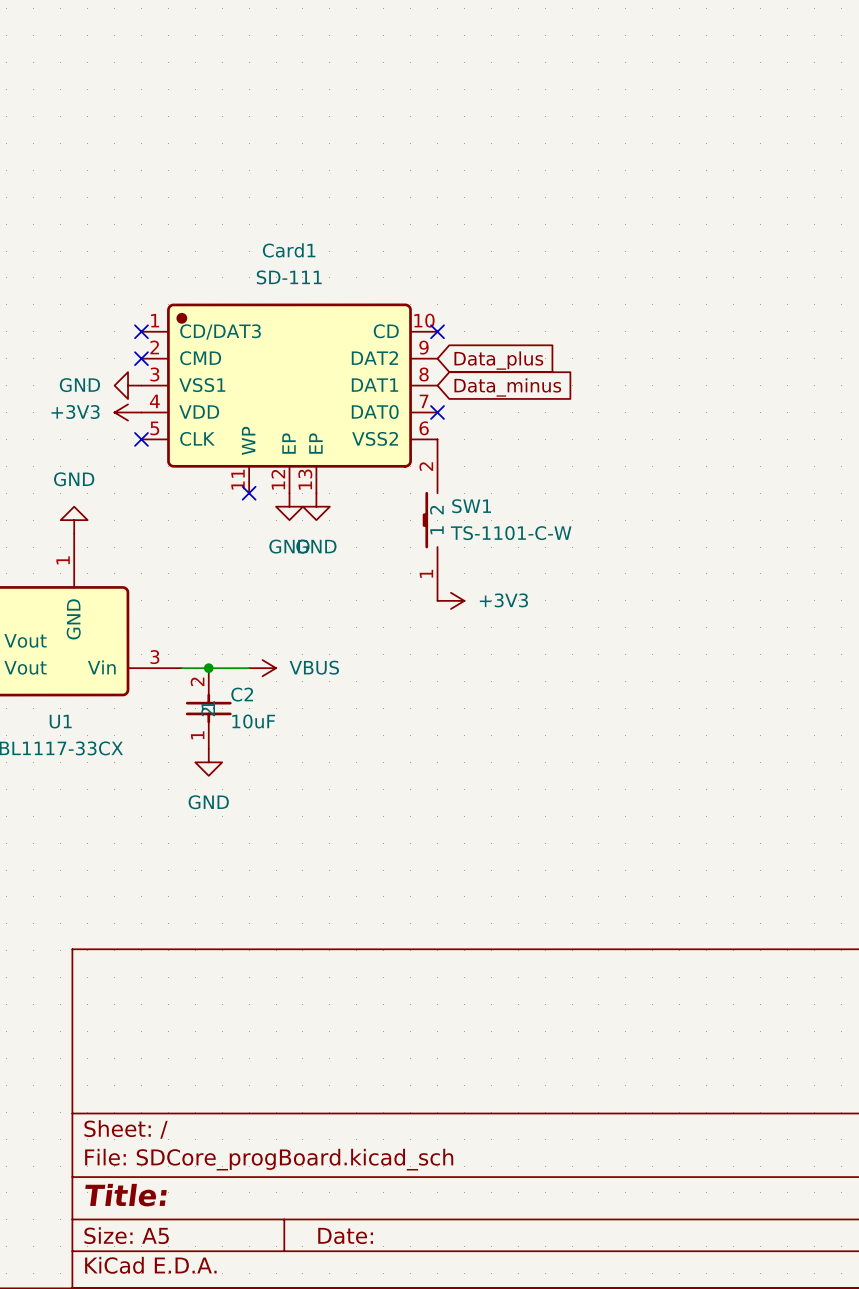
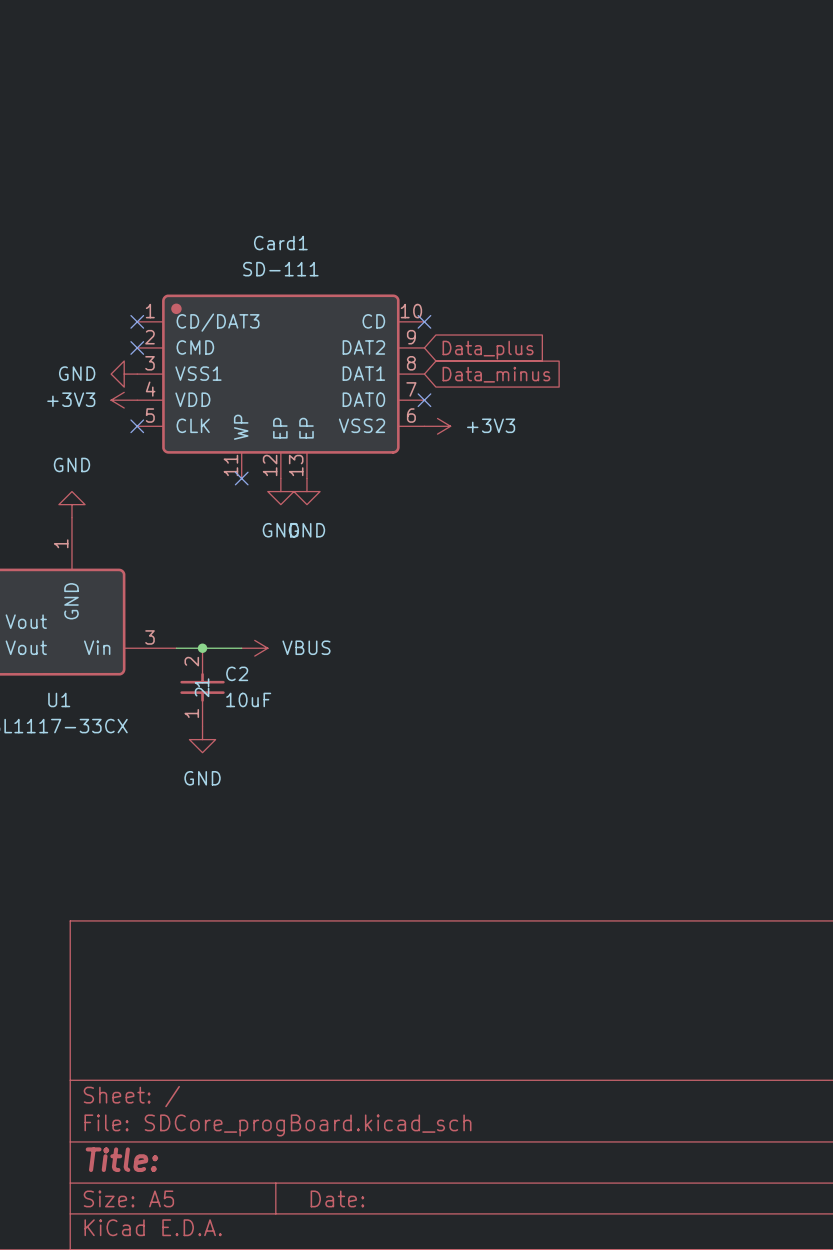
SW1: TS-1101-C-W (430, 520) -> none
power symbol position: +3V3 (450, 600) -> +3V3 (437, 426)

